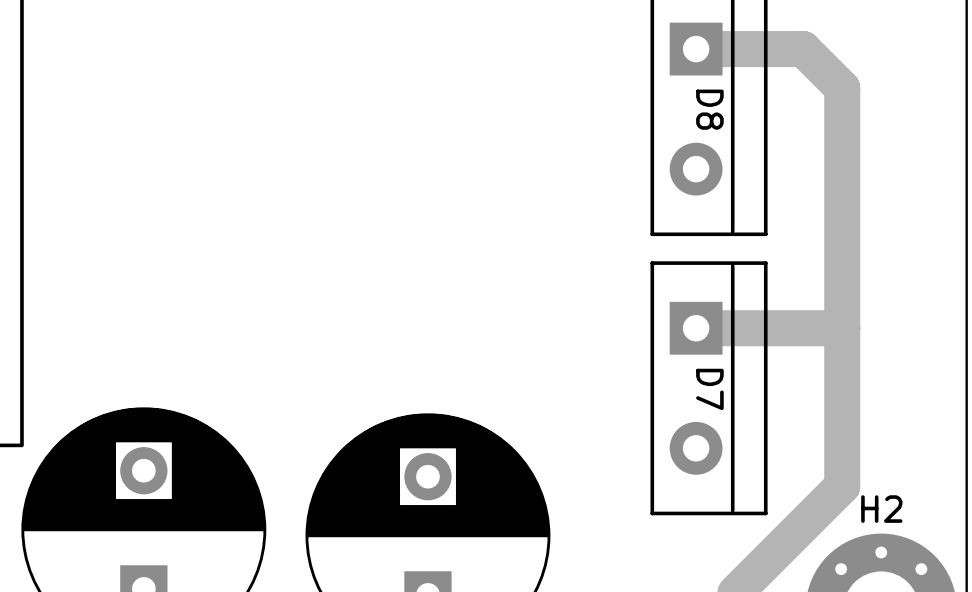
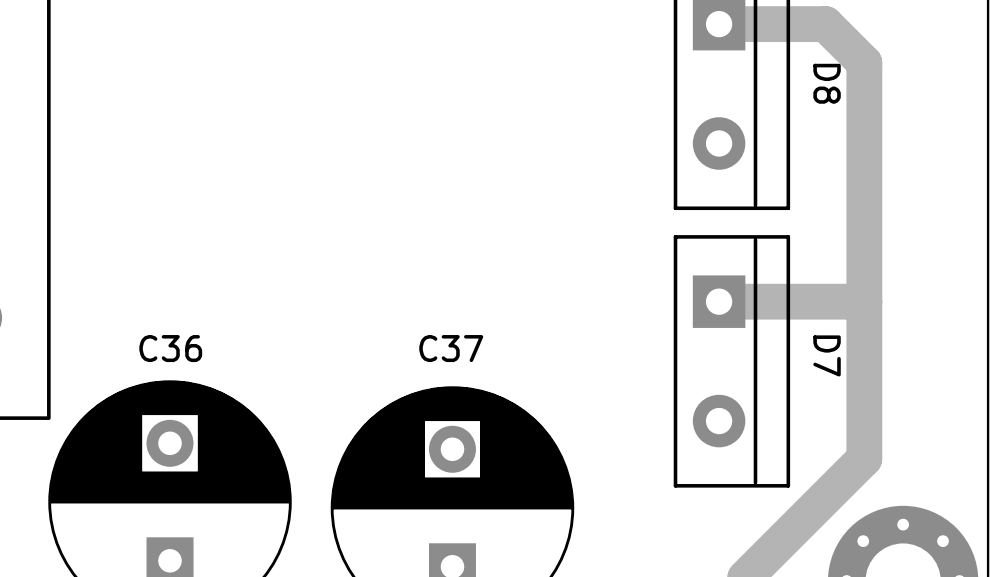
D8 name position: D8 (709, 109) -> D8 (827, 83)
C36 name: none -> C36 (170, 348)
C37 name: none -> C37 (451, 348)
D7 name position: D7 (709, 389) -> D7 (827, 355)
H2 name: H2 (881, 509) -> none

